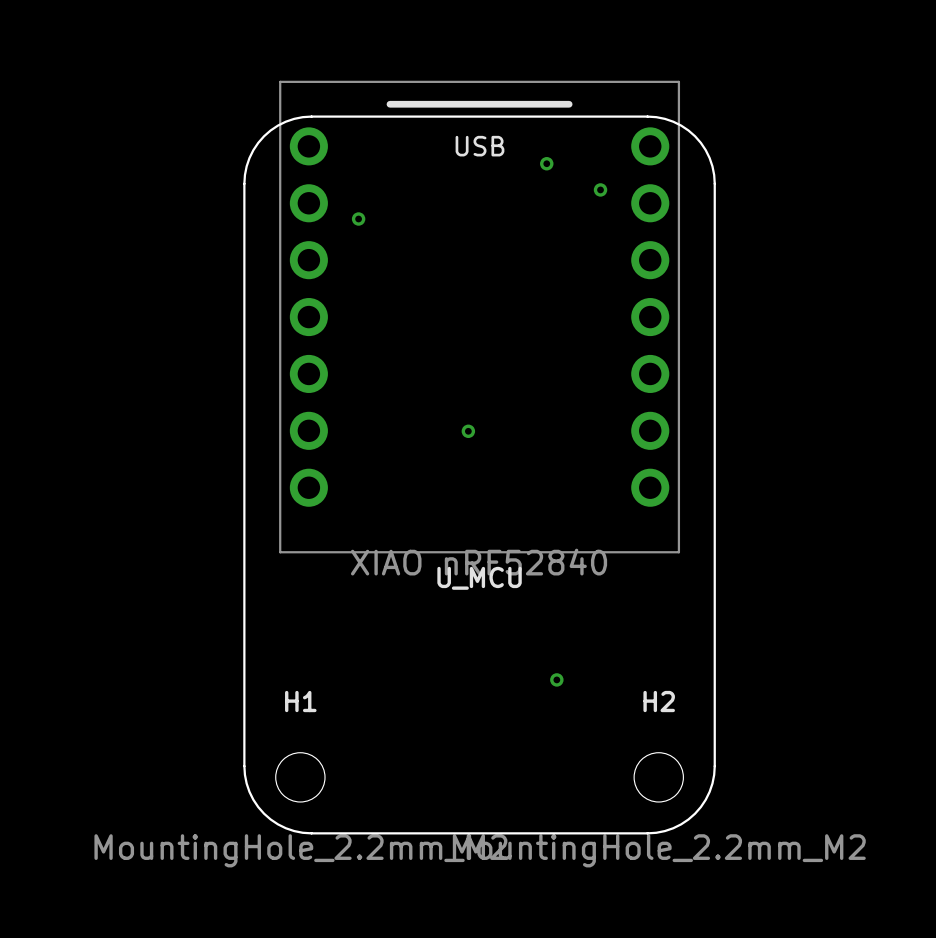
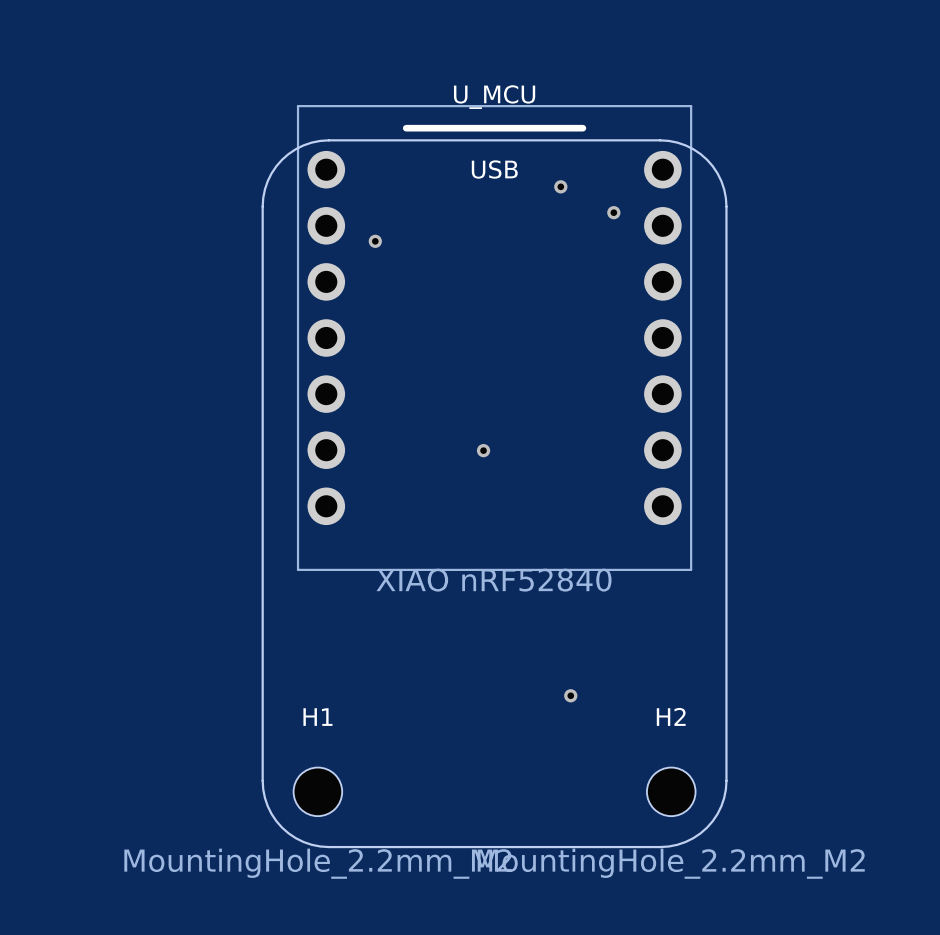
U_MCU name position: U_MCU (479, 578) -> U_MCU (494, 97)

